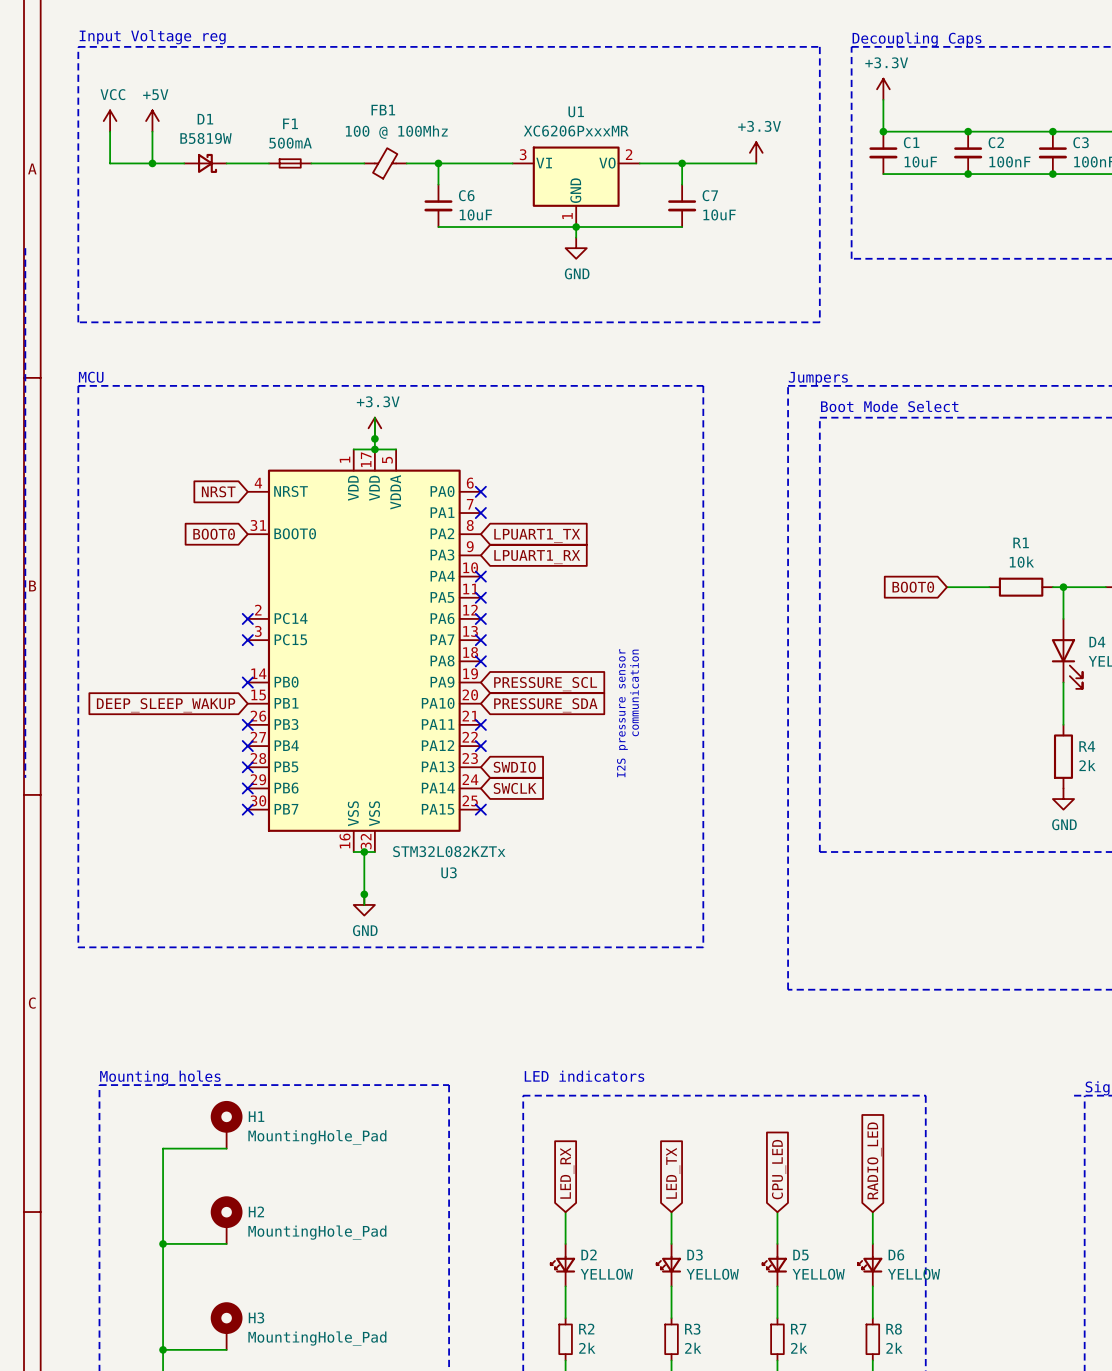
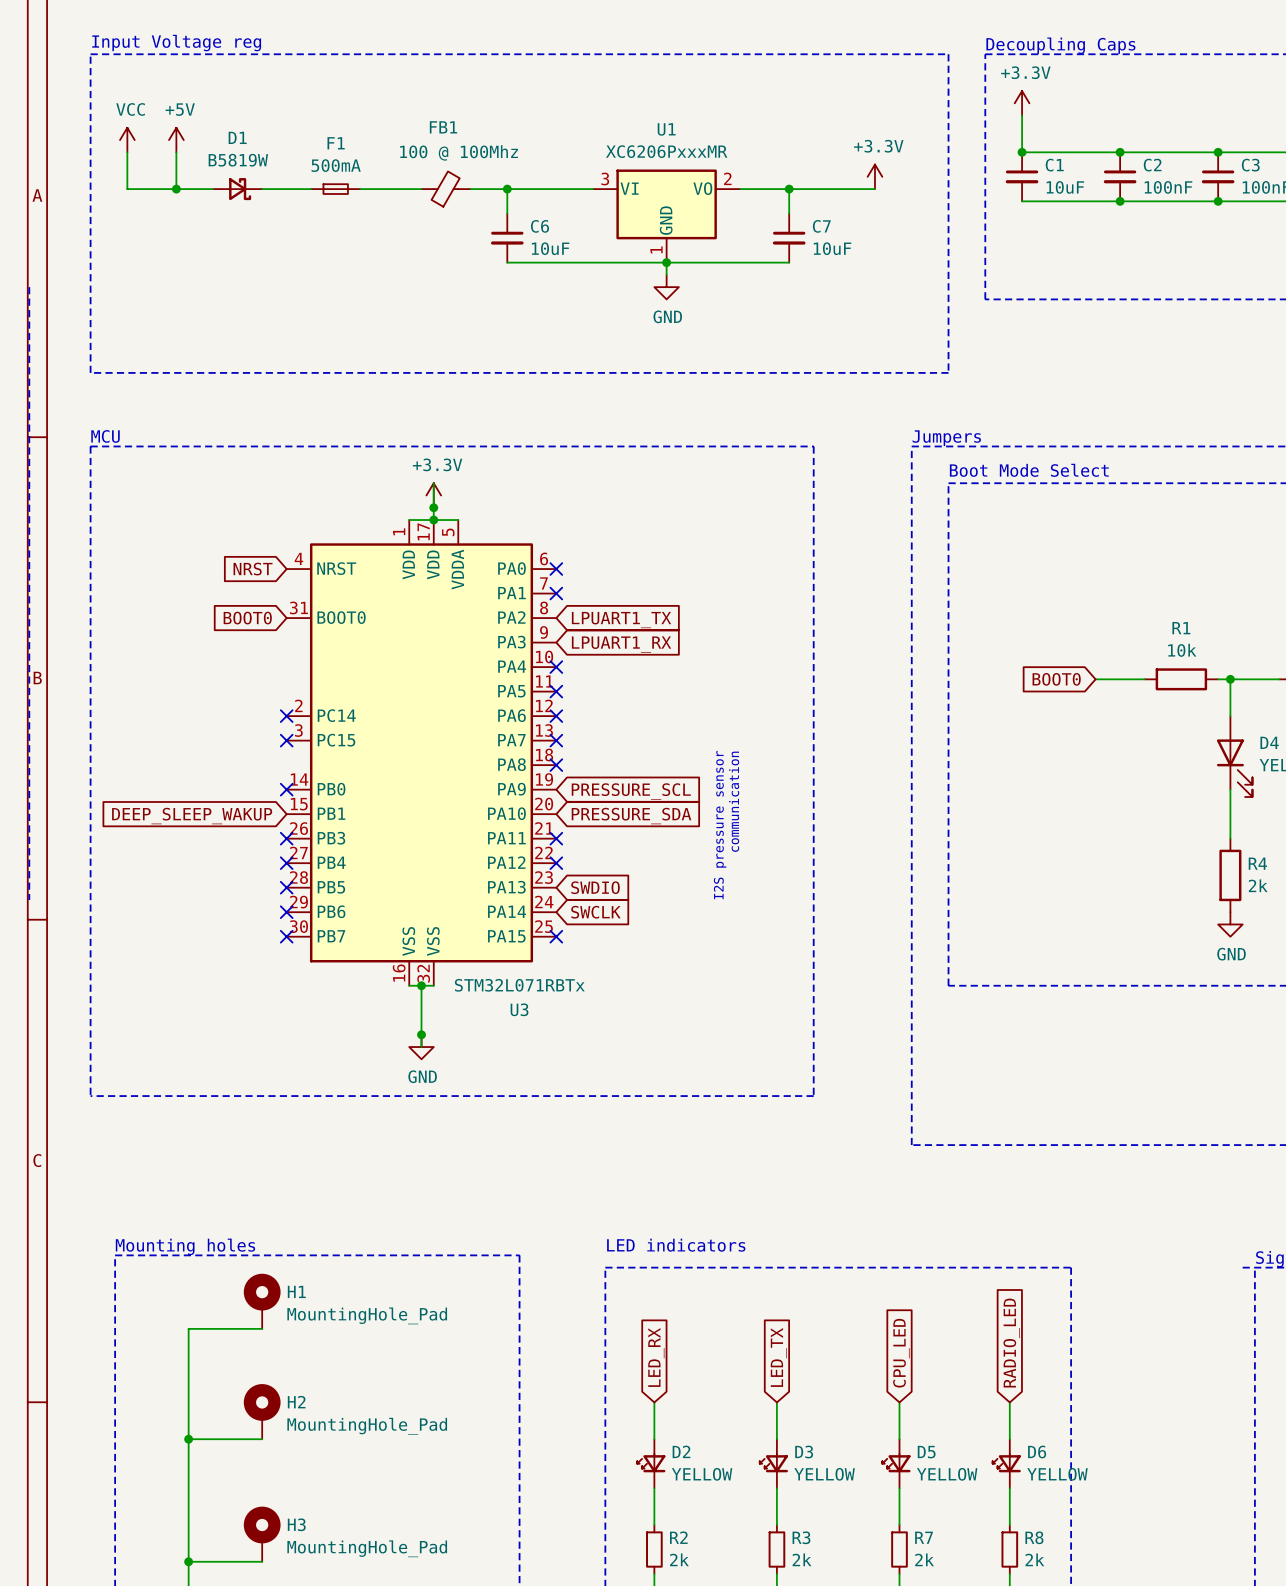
U3 value: STM32L082KZTx (449, 851) -> STM32L071RBTx (519, 985)

